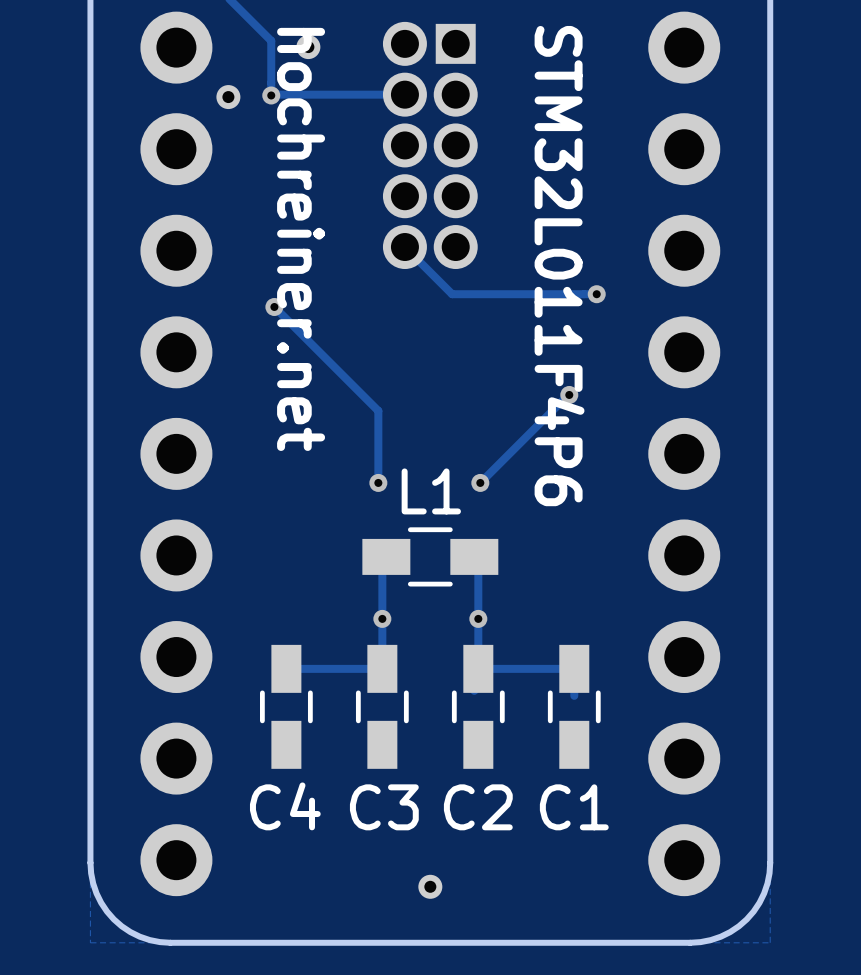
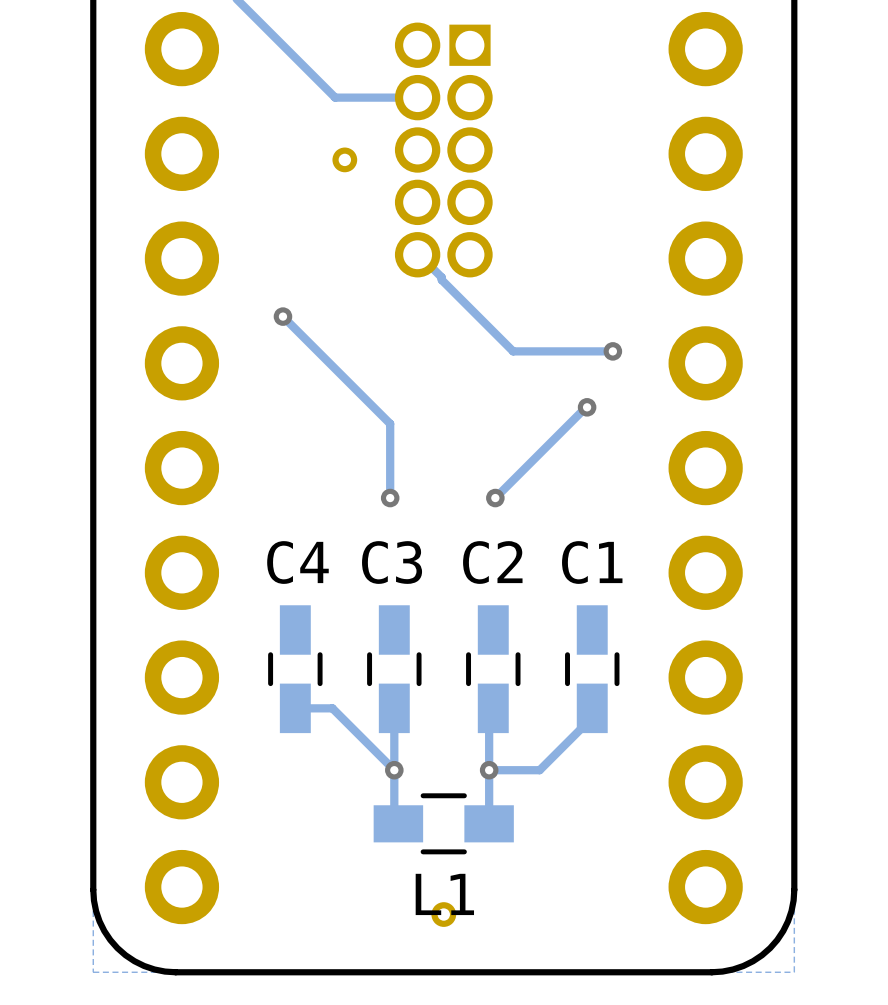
track: (271, 40) (271, 95) (325, 94) -> (279, 42) (335, 97)
part: (308, 47) -> none
via: (271, 95) -> none
part: (228, 97) -> none
part: none -> (344, 159)
text: hochreiner.net (301, 239) -> none
track: (404, 247) (452, 294) (596, 294) -> (419, 254) (513, 351) (612, 351)
text: STM32L011F4P6 (559, 266) -> none
via position: (596, 294) -> (612, 351)
L1 name position: L1 (431, 491) -> L1 (444, 894)
track: (386, 556) (382, 560) (382, 668) (286, 668) -> none
L1 position: (430, 556) -> (443, 823)
track: (474, 556) (478, 560) (478, 668) (574, 668) -> none
via: (382, 618) -> none
via: (478, 618) -> none
track: none -> (295, 708) (332, 708) (394, 770)
track: none -> (394, 708) (394, 819) (398, 823)
track: none -> (489, 712) (489, 823)
track: none -> (592, 717) (539, 770) (489, 770)
C4 position: (286, 706) -> (295, 669)
C3 position: (382, 706) -> (394, 669)
C2 position: (478, 706) -> (493, 669)
C1 position: (574, 706) -> (592, 669)
via: none -> (394, 770)
via: none -> (489, 770)
C4 name position: C4 (285, 806) -> C4 (297, 562)
C3 name position: C3 (384, 807) -> C3 (392, 562)
C2 name position: C2 (478, 807) -> C2 (492, 562)
C1 name position: C1 (574, 807) -> C1 (592, 562)

